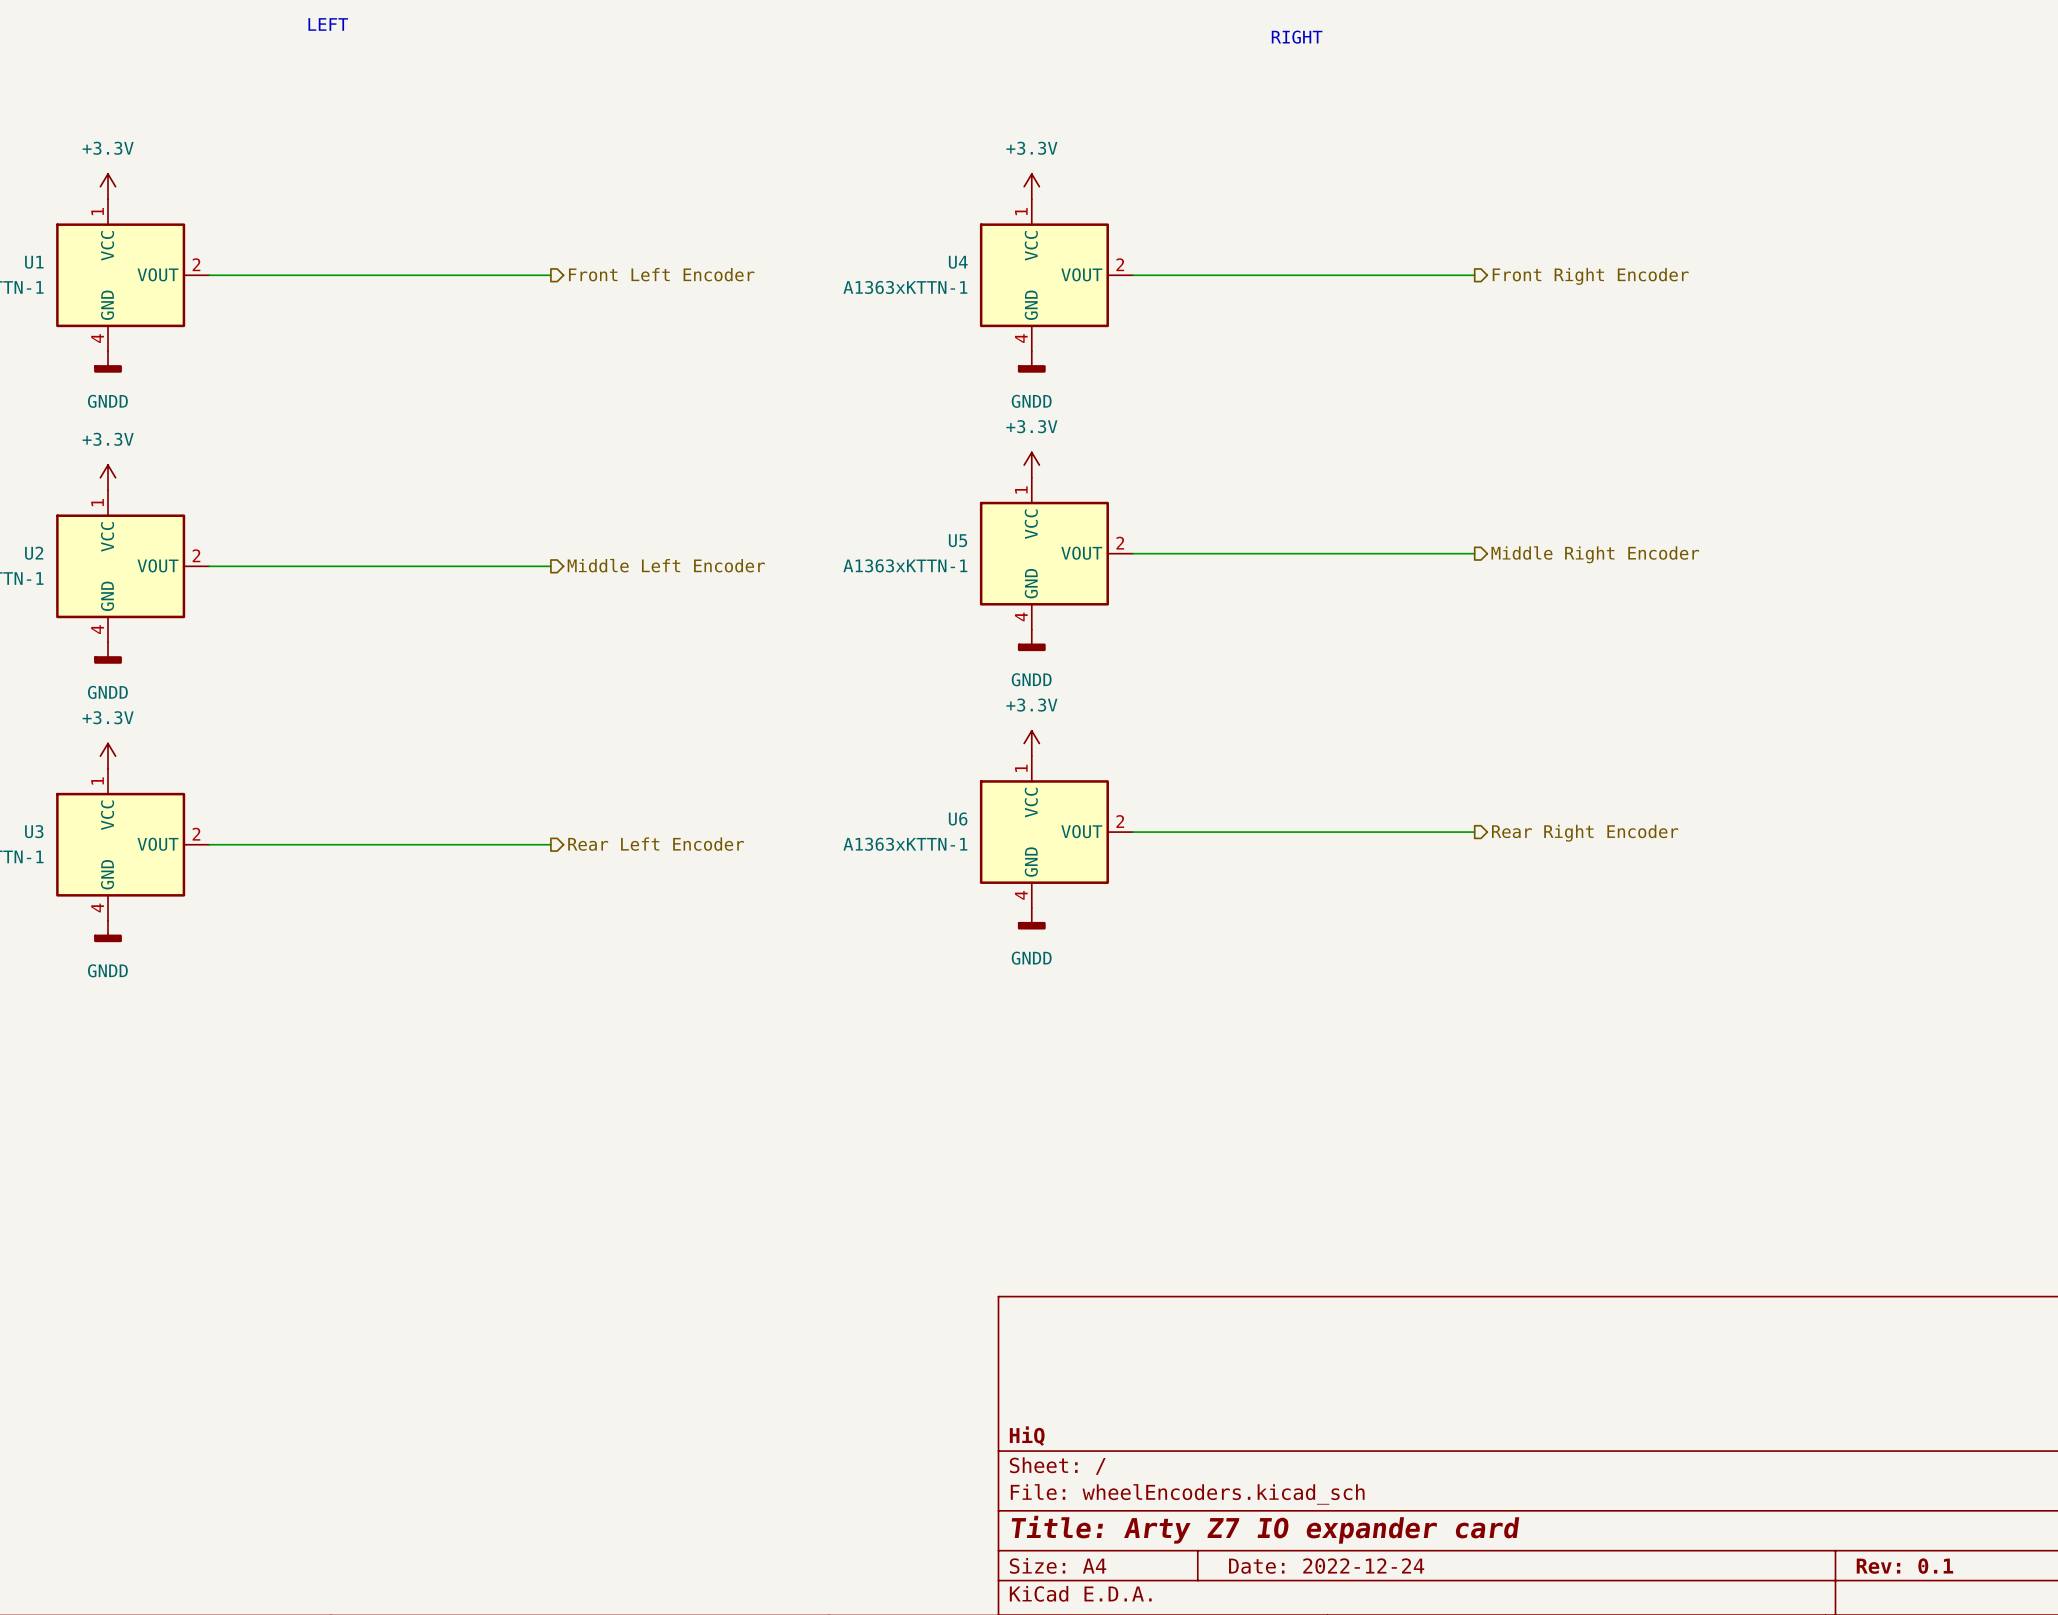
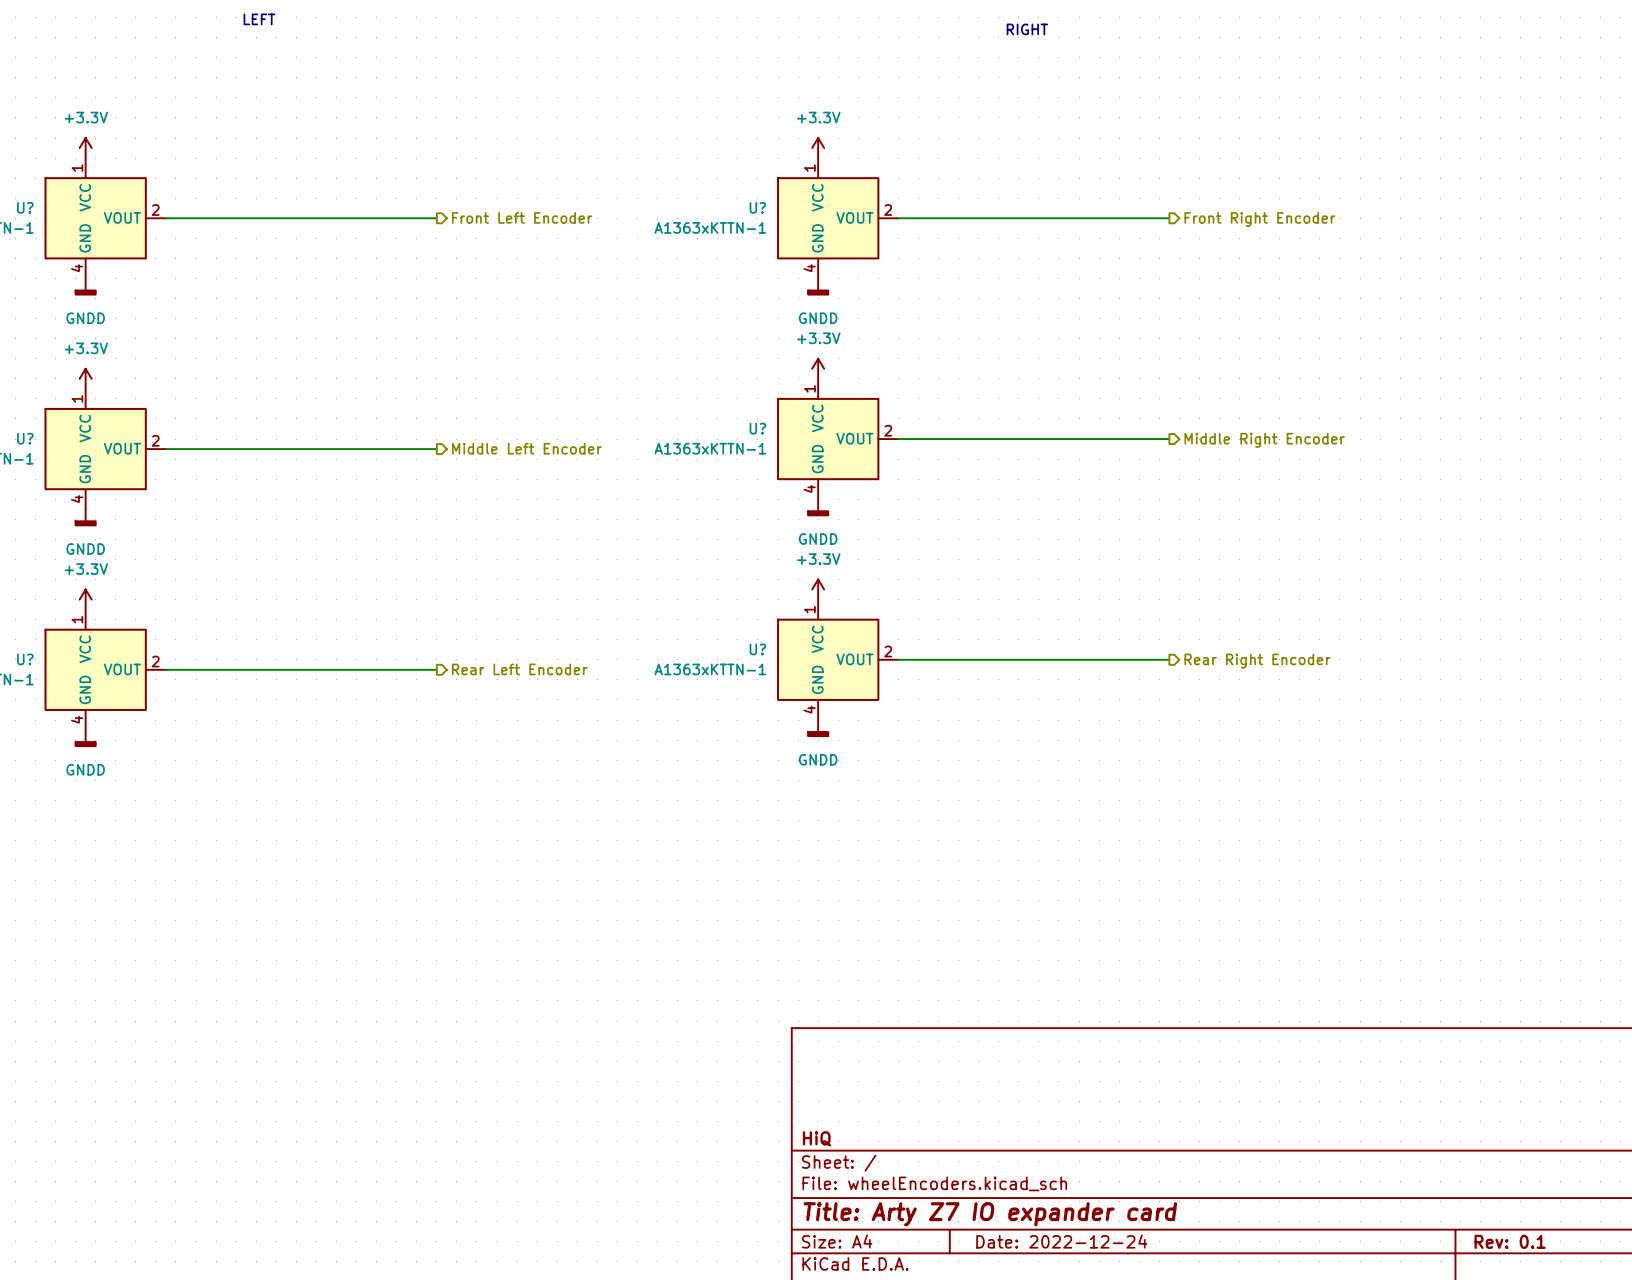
U1 name: U1 (34, 262) -> U? (25, 207)
U4 name: U4 (958, 262) -> U? (757, 207)
U5 name: U5 (957, 540) -> U? (757, 428)
U2 name: U2 (34, 553) -> U? (25, 438)
U6 name: U6 (958, 818) -> U? (757, 649)
U3 name: U3 (34, 831) -> U? (25, 659)

